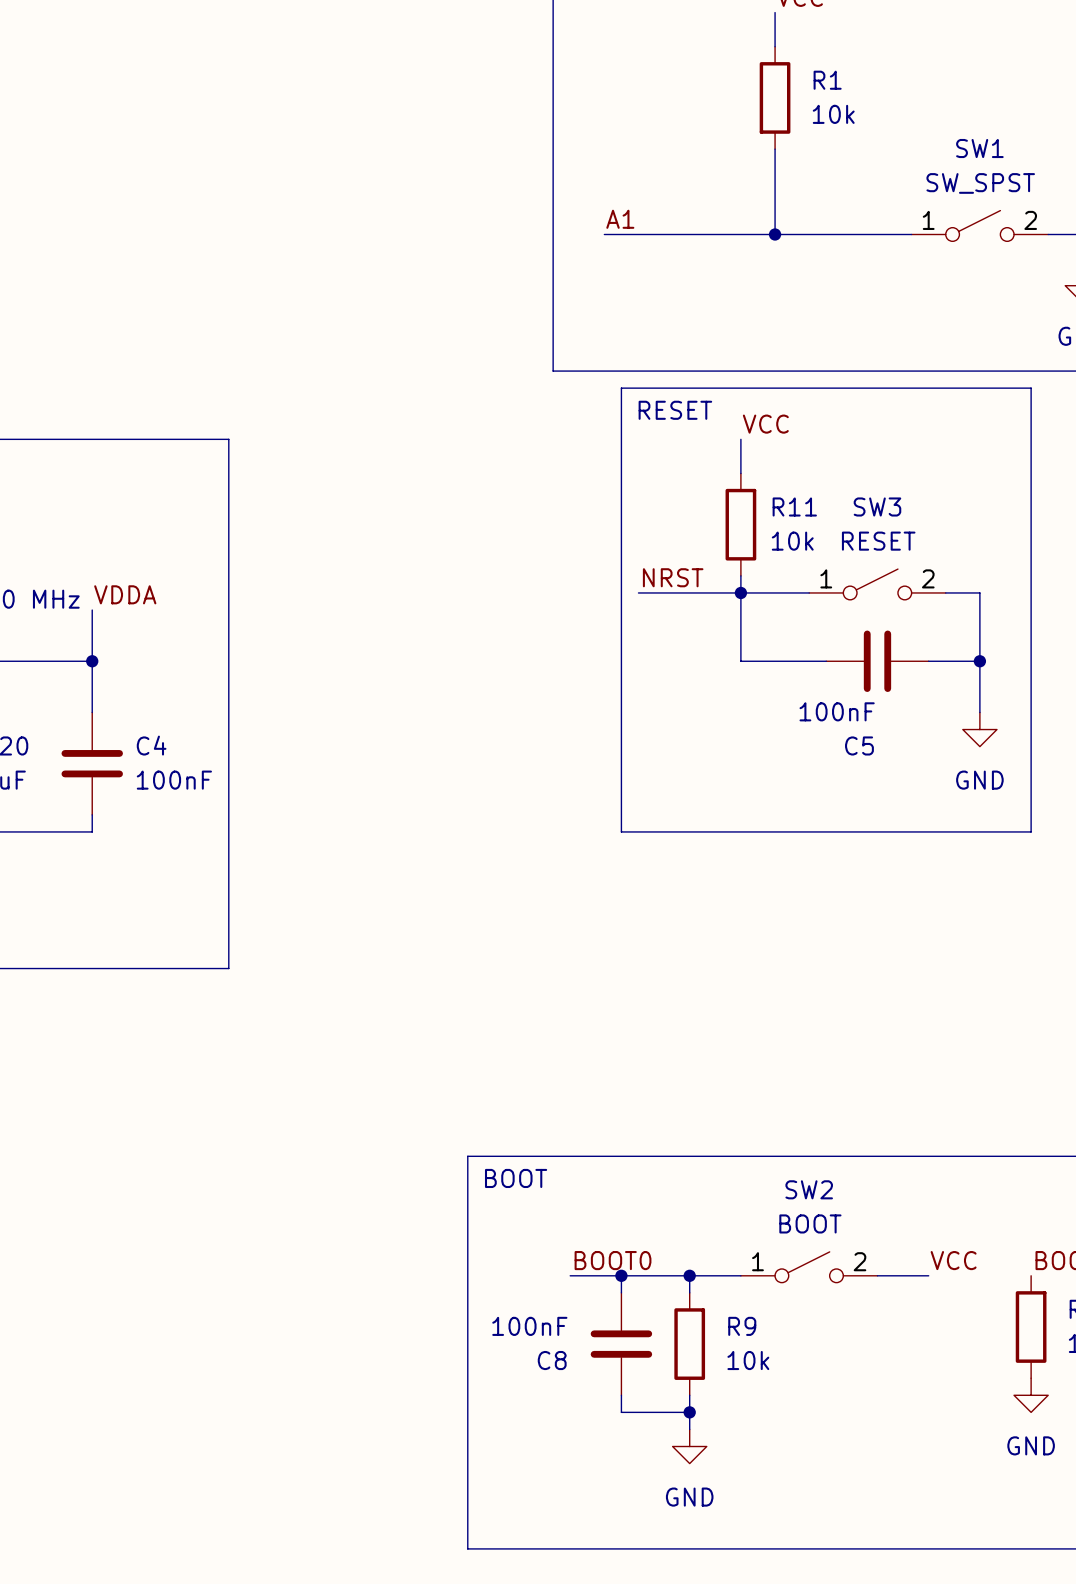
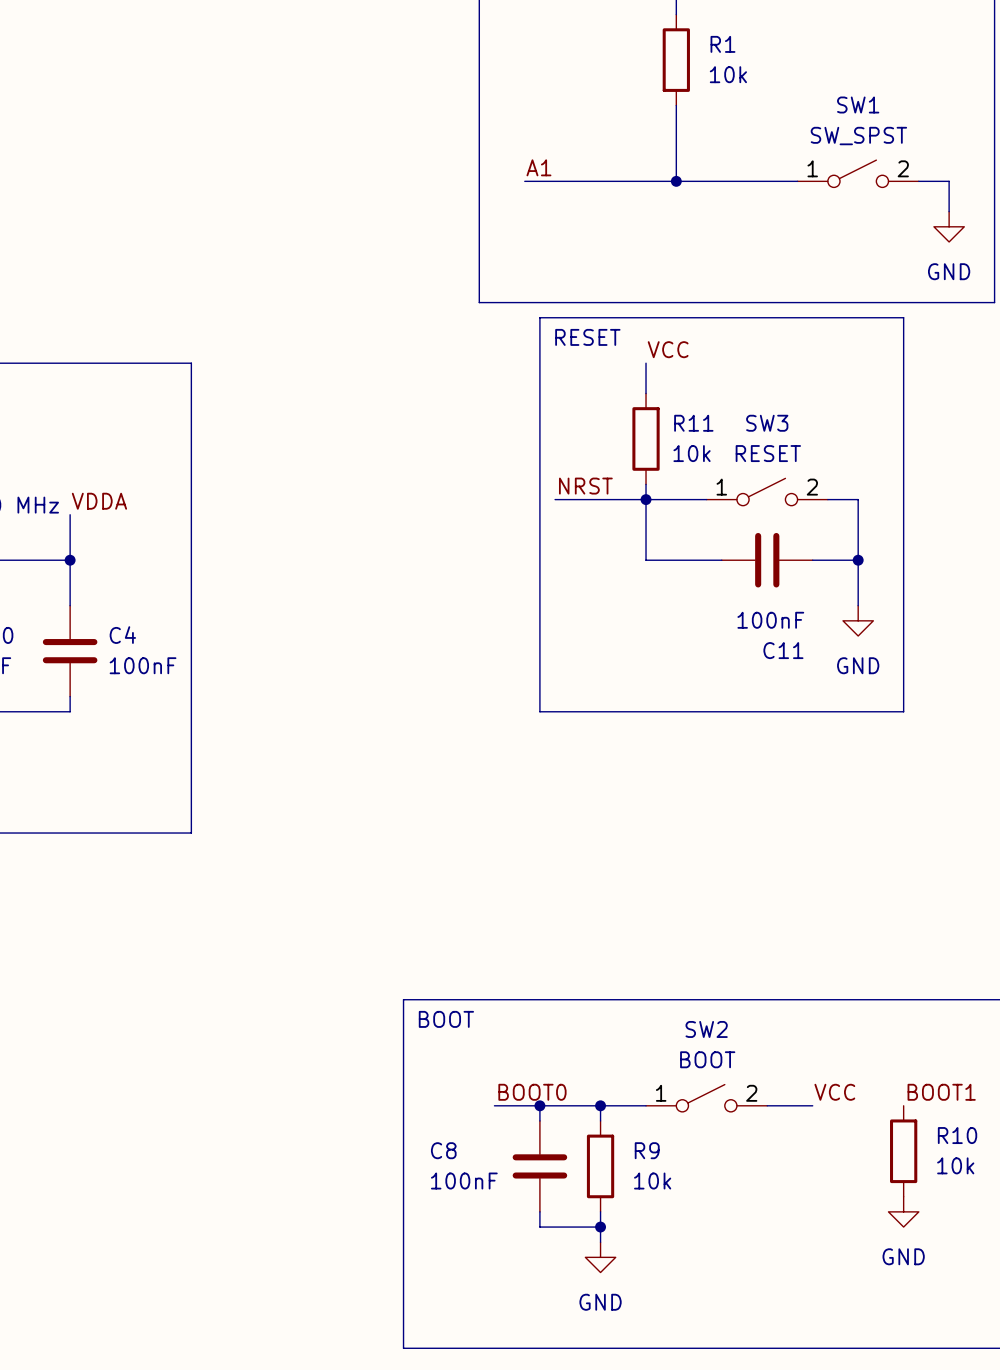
C5 value position: 100nF (837, 711) -> 100nF (770, 620)
C5 name: C5 (859, 745) -> C11 (783, 650)
C8 value position: 100nF (529, 1326) -> 100nF (464, 1181)
C8 name position: C8 (552, 1360) -> C8 (443, 1150)

